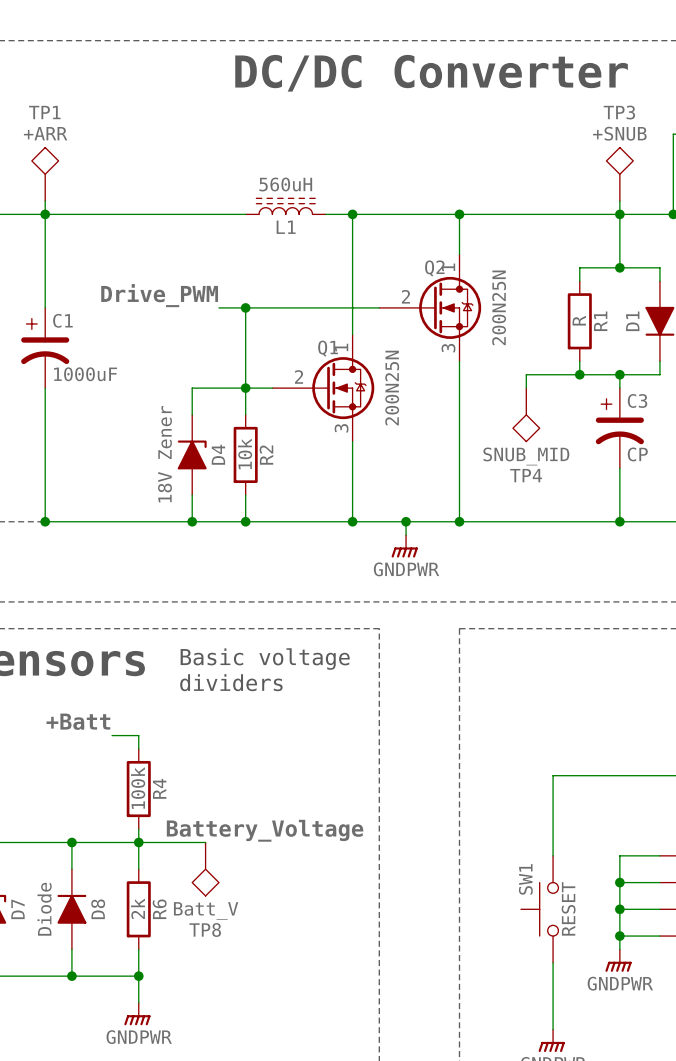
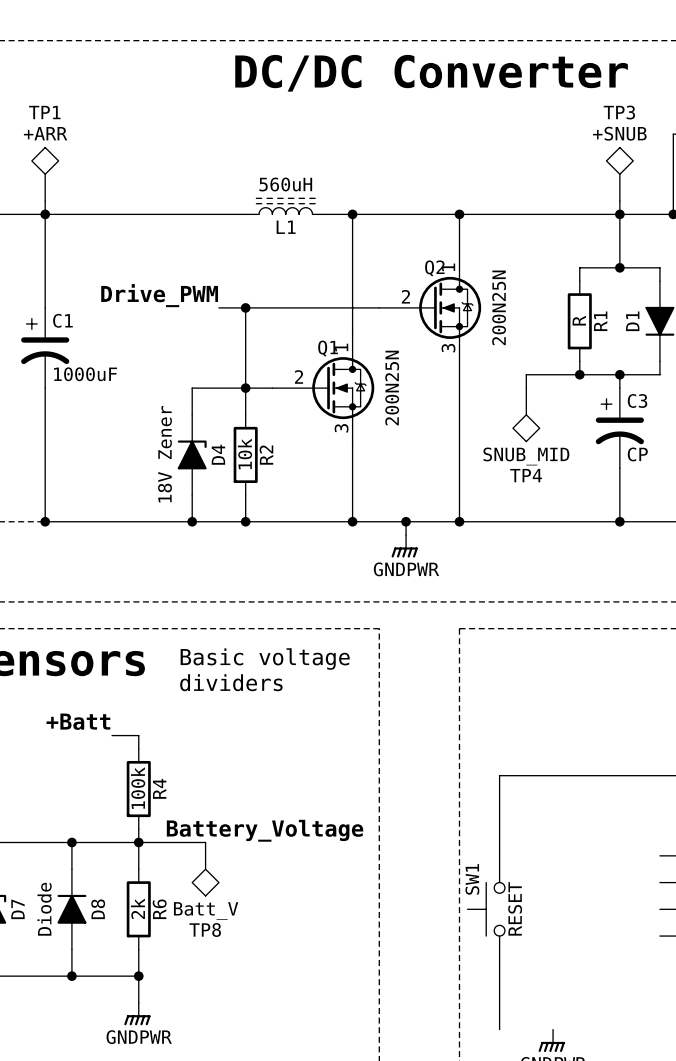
wire: (553, 775) (553, 855) -> (553, 775) (499, 775) (499, 855)
wire: (659, 855) (619, 855) (619, 949) -> none
wire: (619, 882) (659, 882) -> none
junction: (619, 882) -> none
SW1 position: (539, 909) -> (486, 909)
wire: (619, 909) (659, 909) -> none
junction: (619, 909) -> none
wire: (619, 936) (659, 936) -> none
junction: (619, 936) -> none
power symbol: GNDPWR (618, 960) -> none
wire: (553, 962) (553, 1029) -> (499, 962) (499, 1029)

